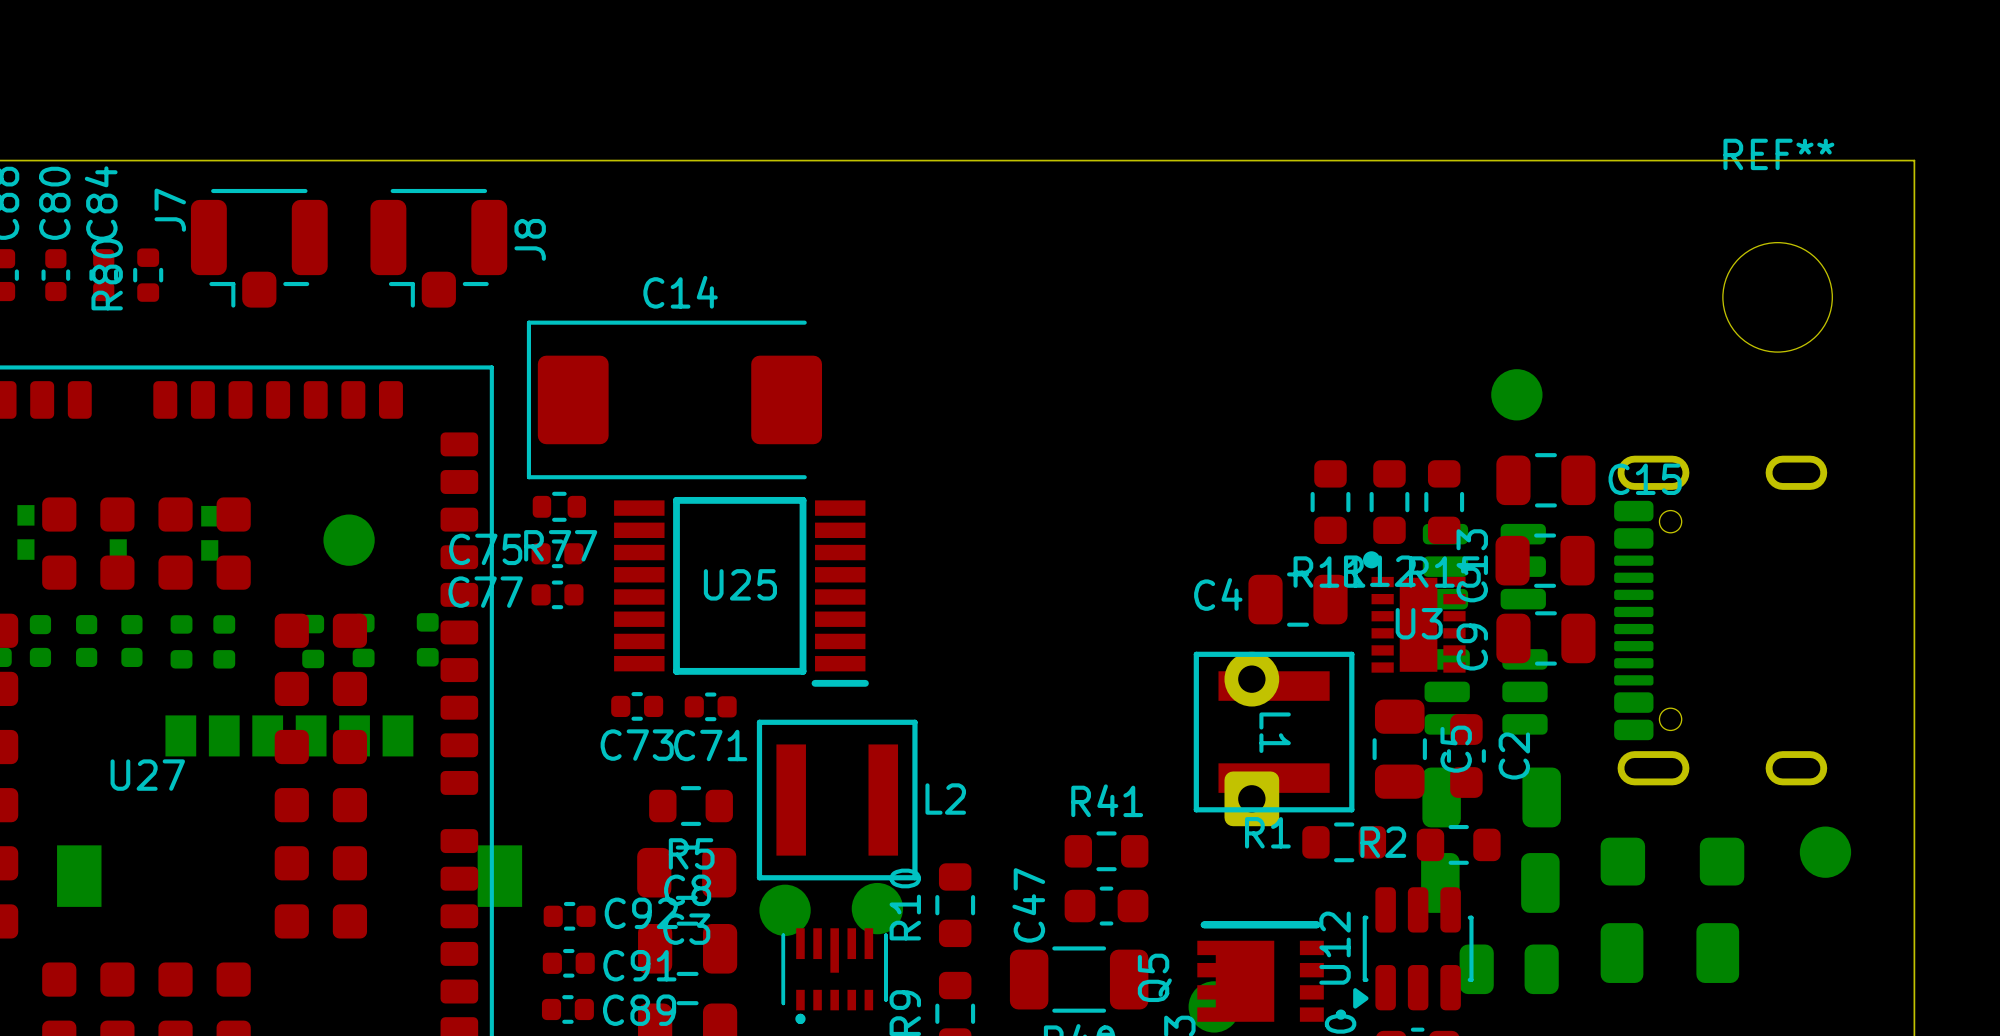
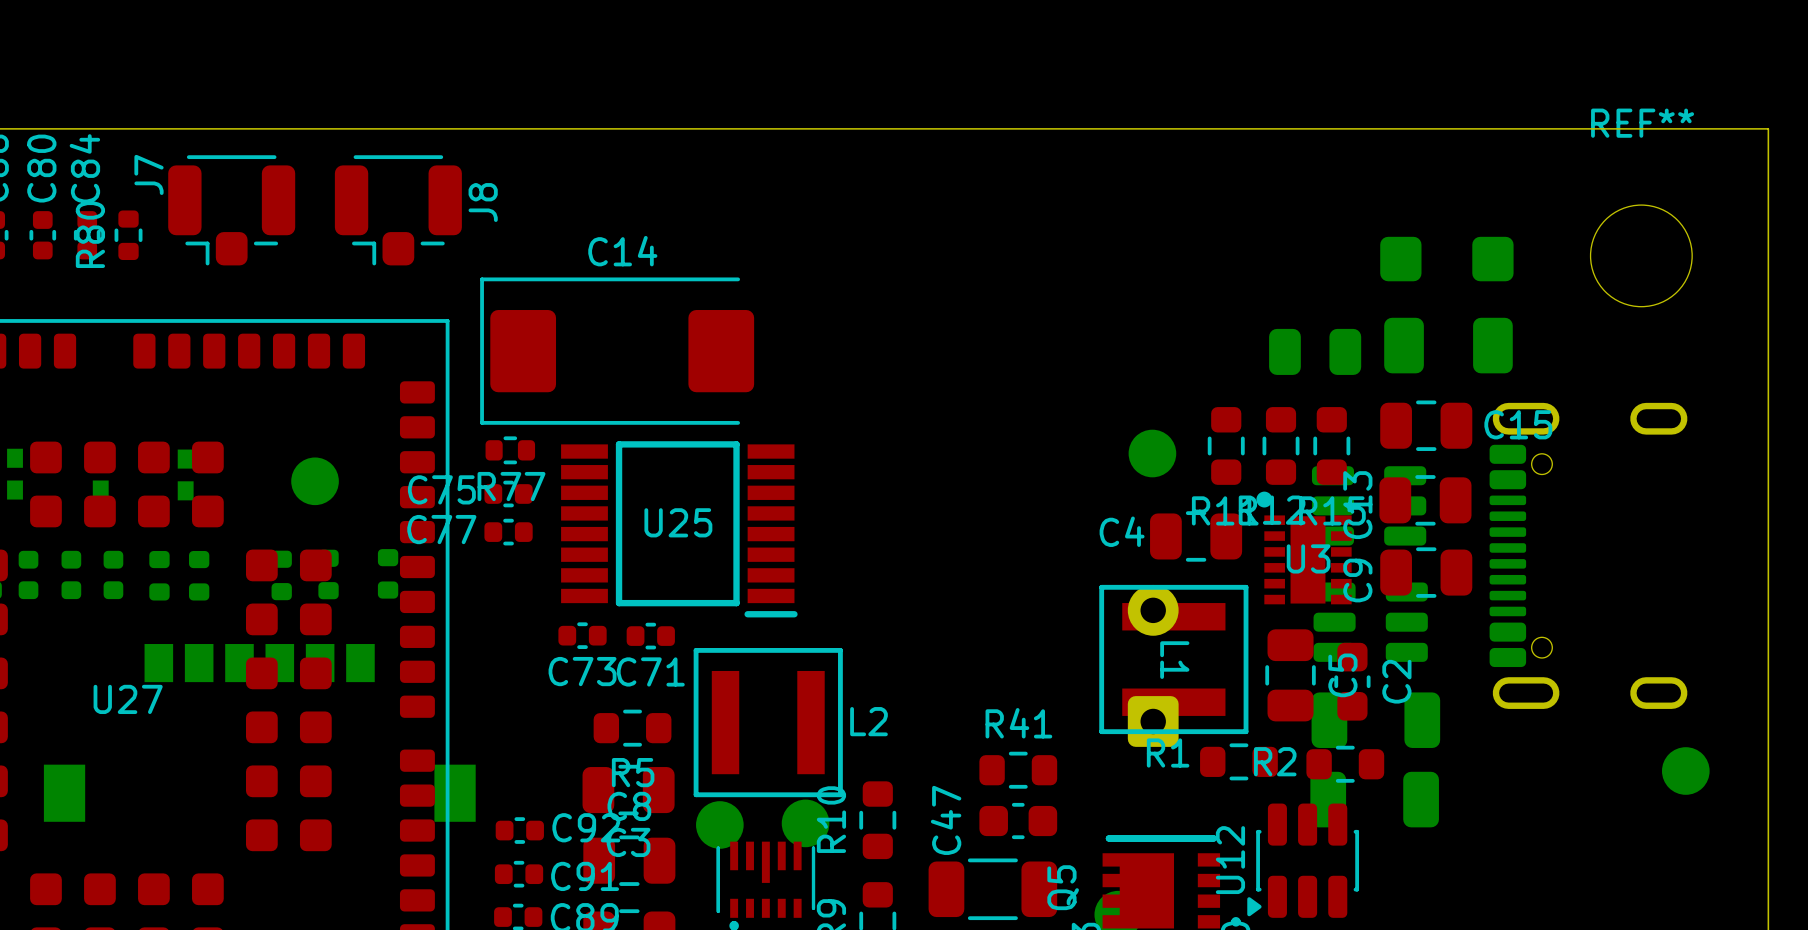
part position: (1516, 394) -> (1152, 453)
part position: (1672, 861) -> (1446, 259)
part position: (1669, 953) -> (1448, 345)
part position: (1509, 969) -> (1315, 351)

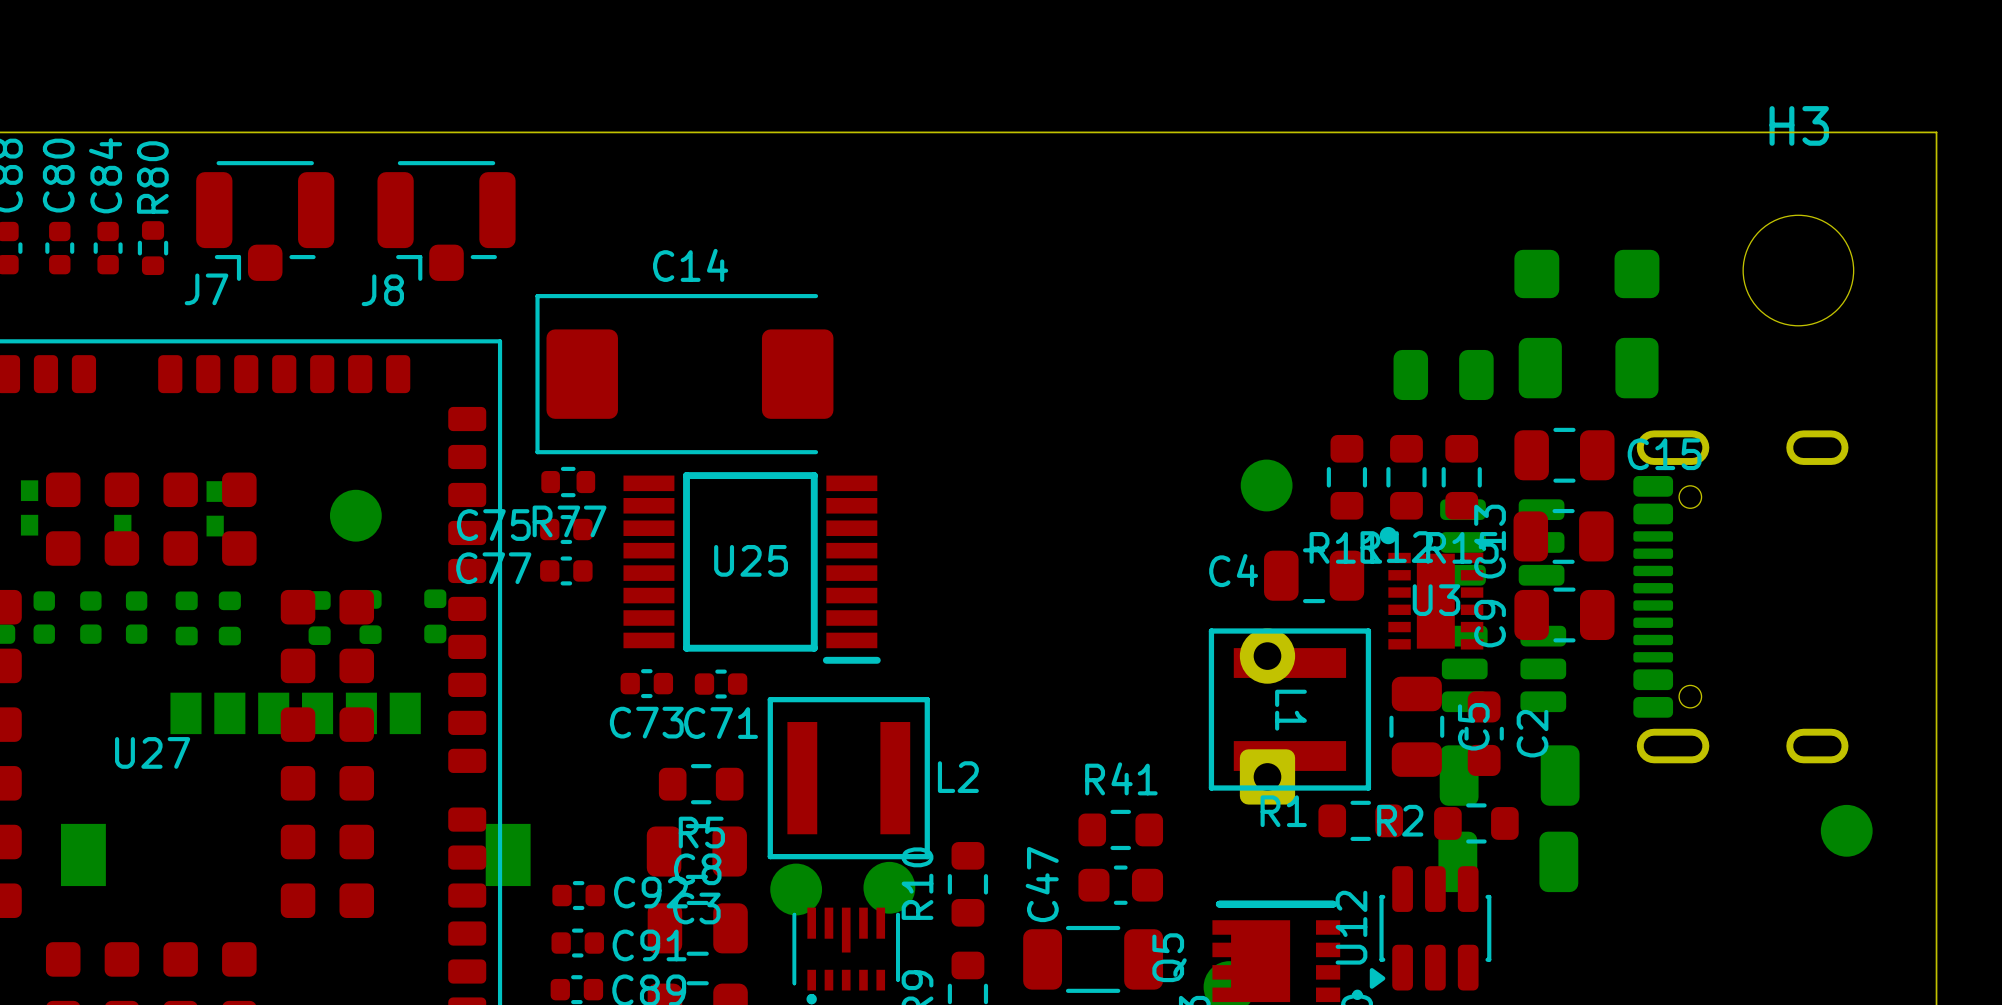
REF** name: REF** (1642, 123) -> H3 (1799, 125)
J7 name rotation: 0° (149, 174) -> 90° clockwise (206, 289)
J7 name position: J7 (149, 174) -> J7 (206, 289)
J8 name rotation: 0° (483, 202) -> 90° clockwise (382, 290)
J8 name position: J8 (483, 202) -> J8 (382, 290)
R80 name position: R80 (90, 234) -> R80 (152, 177)

